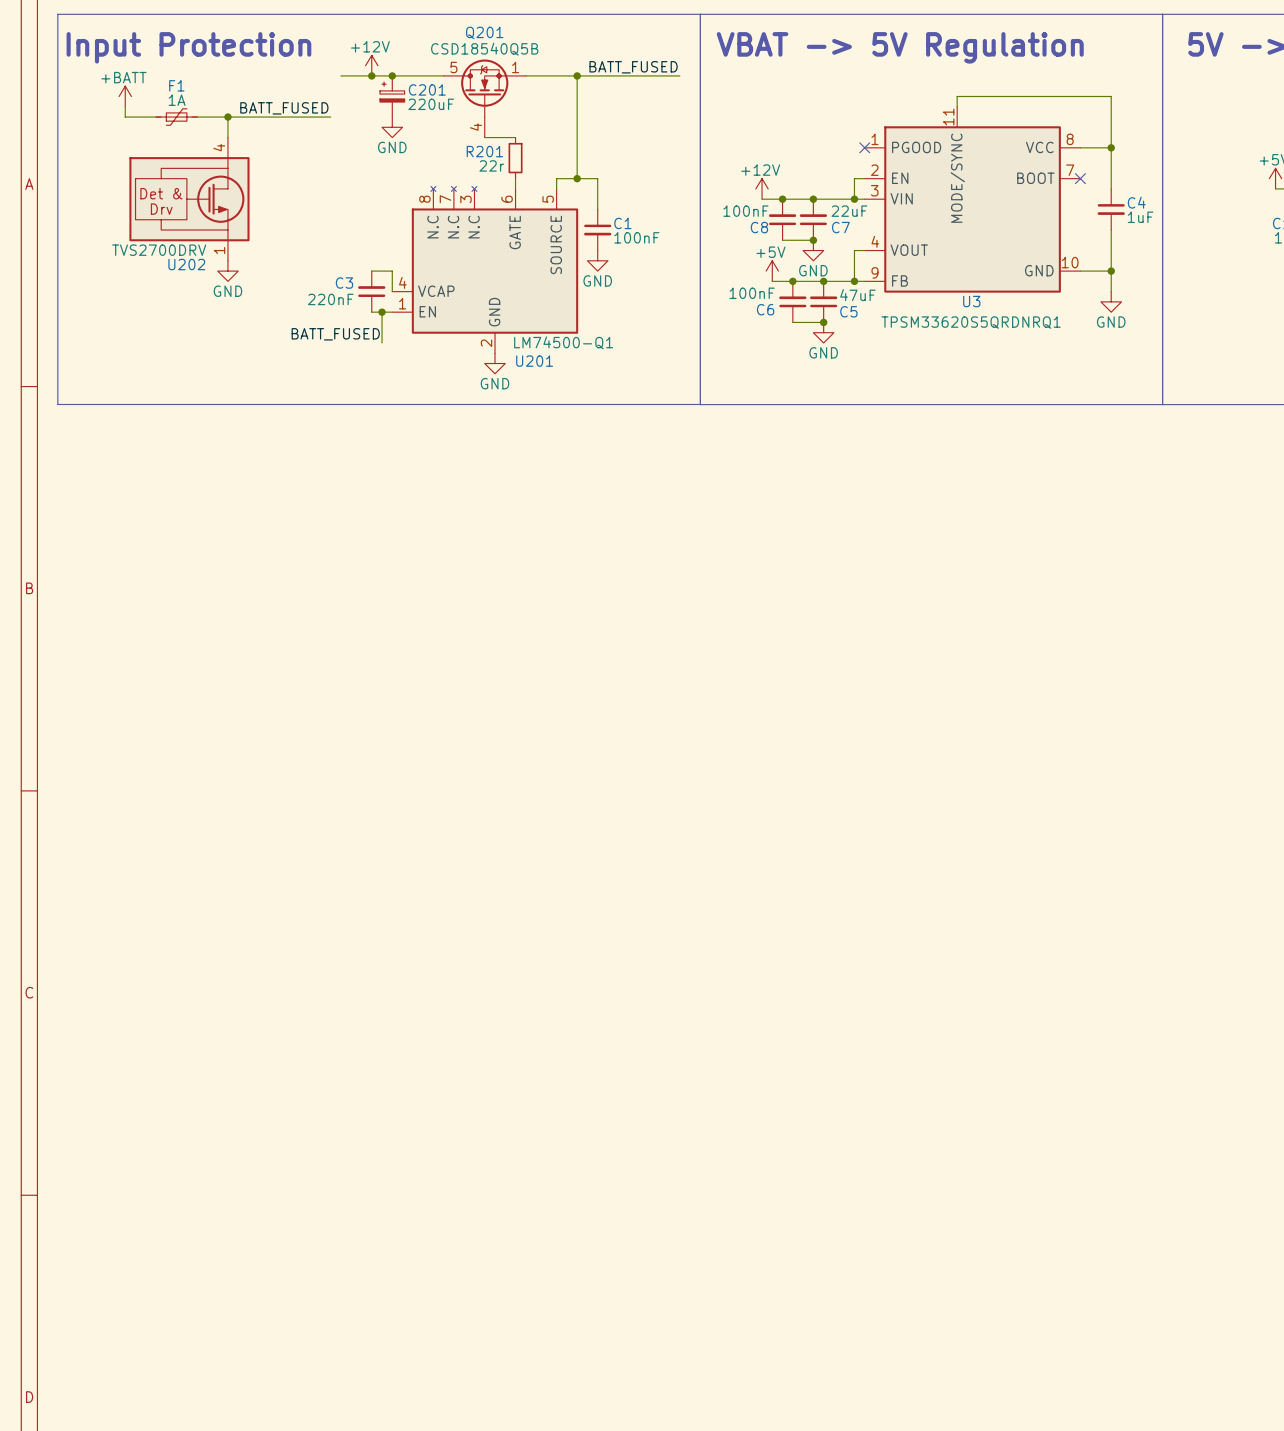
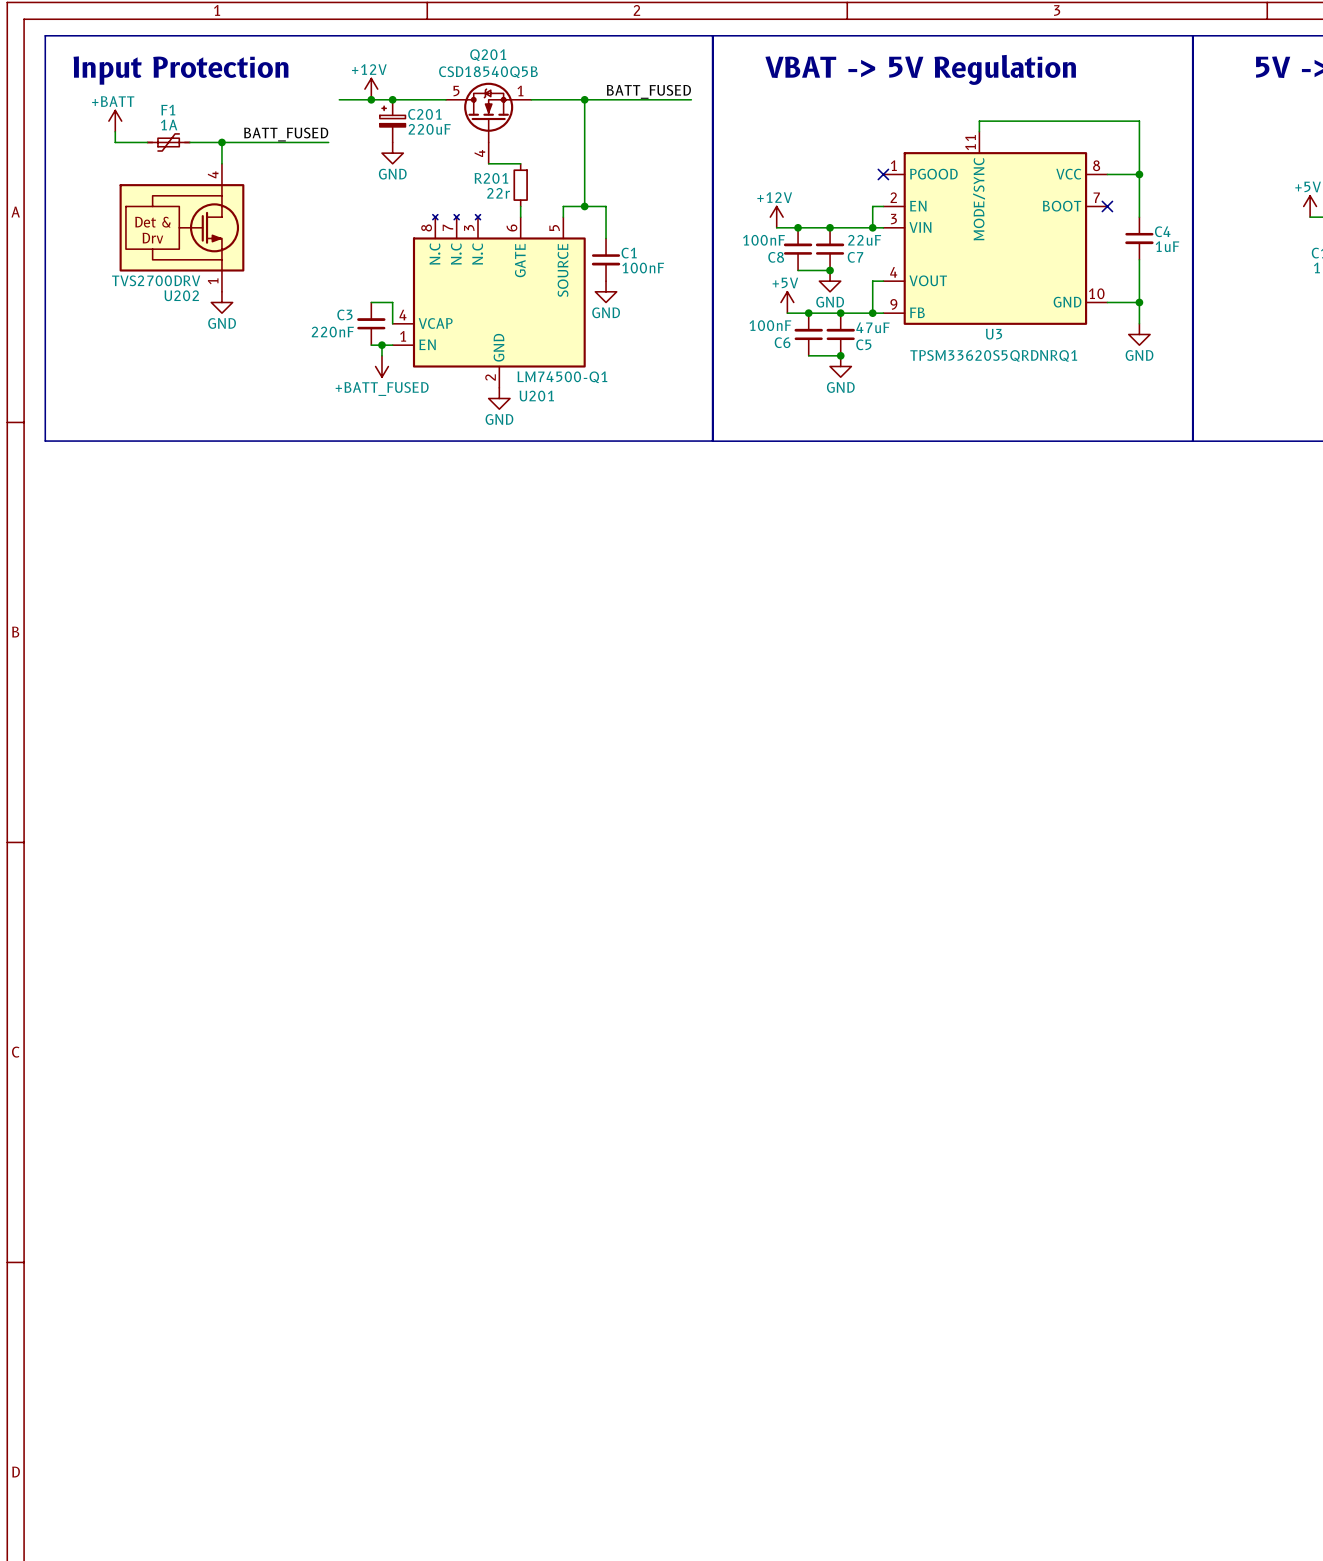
power symbol: none -> +BATT_FUSED (381, 366)
label: BATT_FUSED (335, 334) -> none

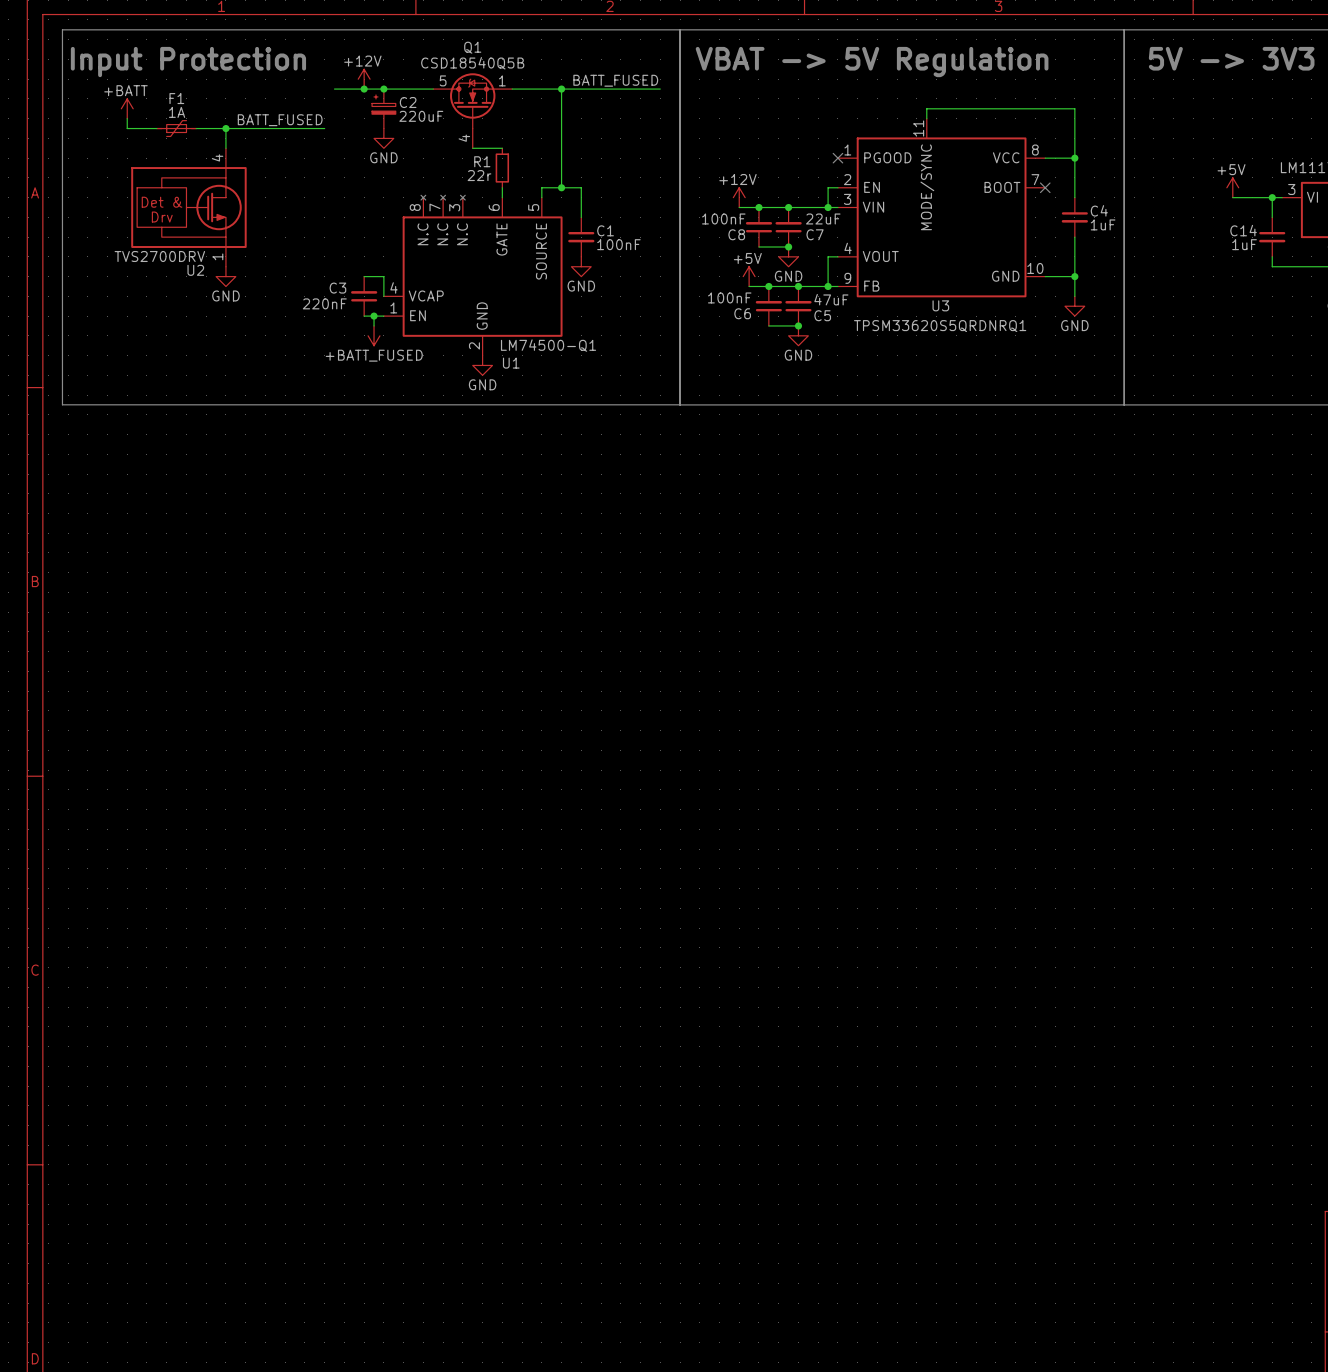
Q201 name: Q201 (488, 55) -> Q1 (472, 47)
C201 name: C201 (424, 114) -> C2 (408, 102)
R201 name: R201 (491, 178) -> R1 (482, 161)
U202 name: U202 (181, 295) -> U2 (195, 270)
U201 name: U201 (536, 396) -> U1 (511, 363)

